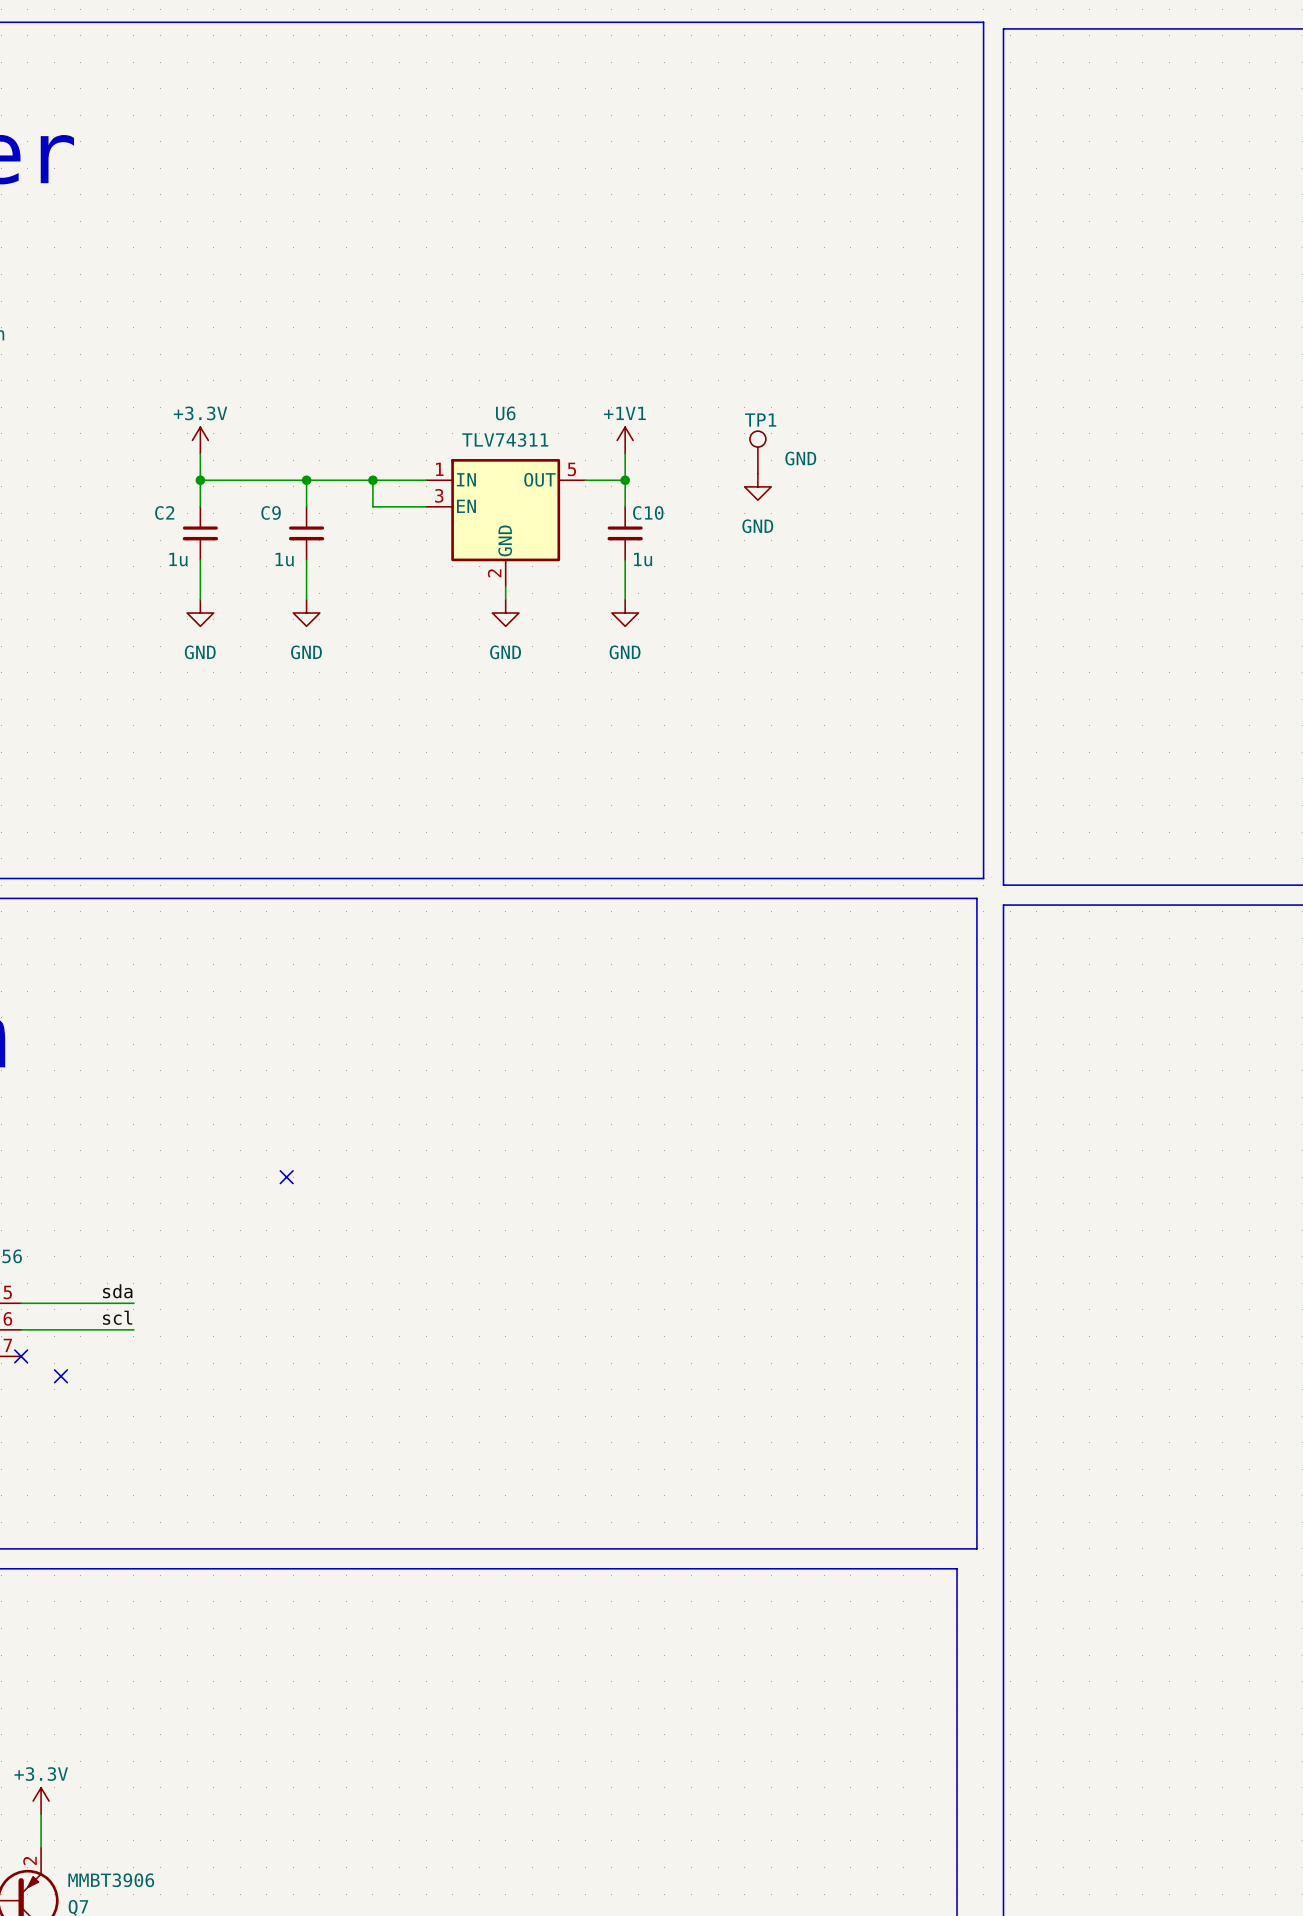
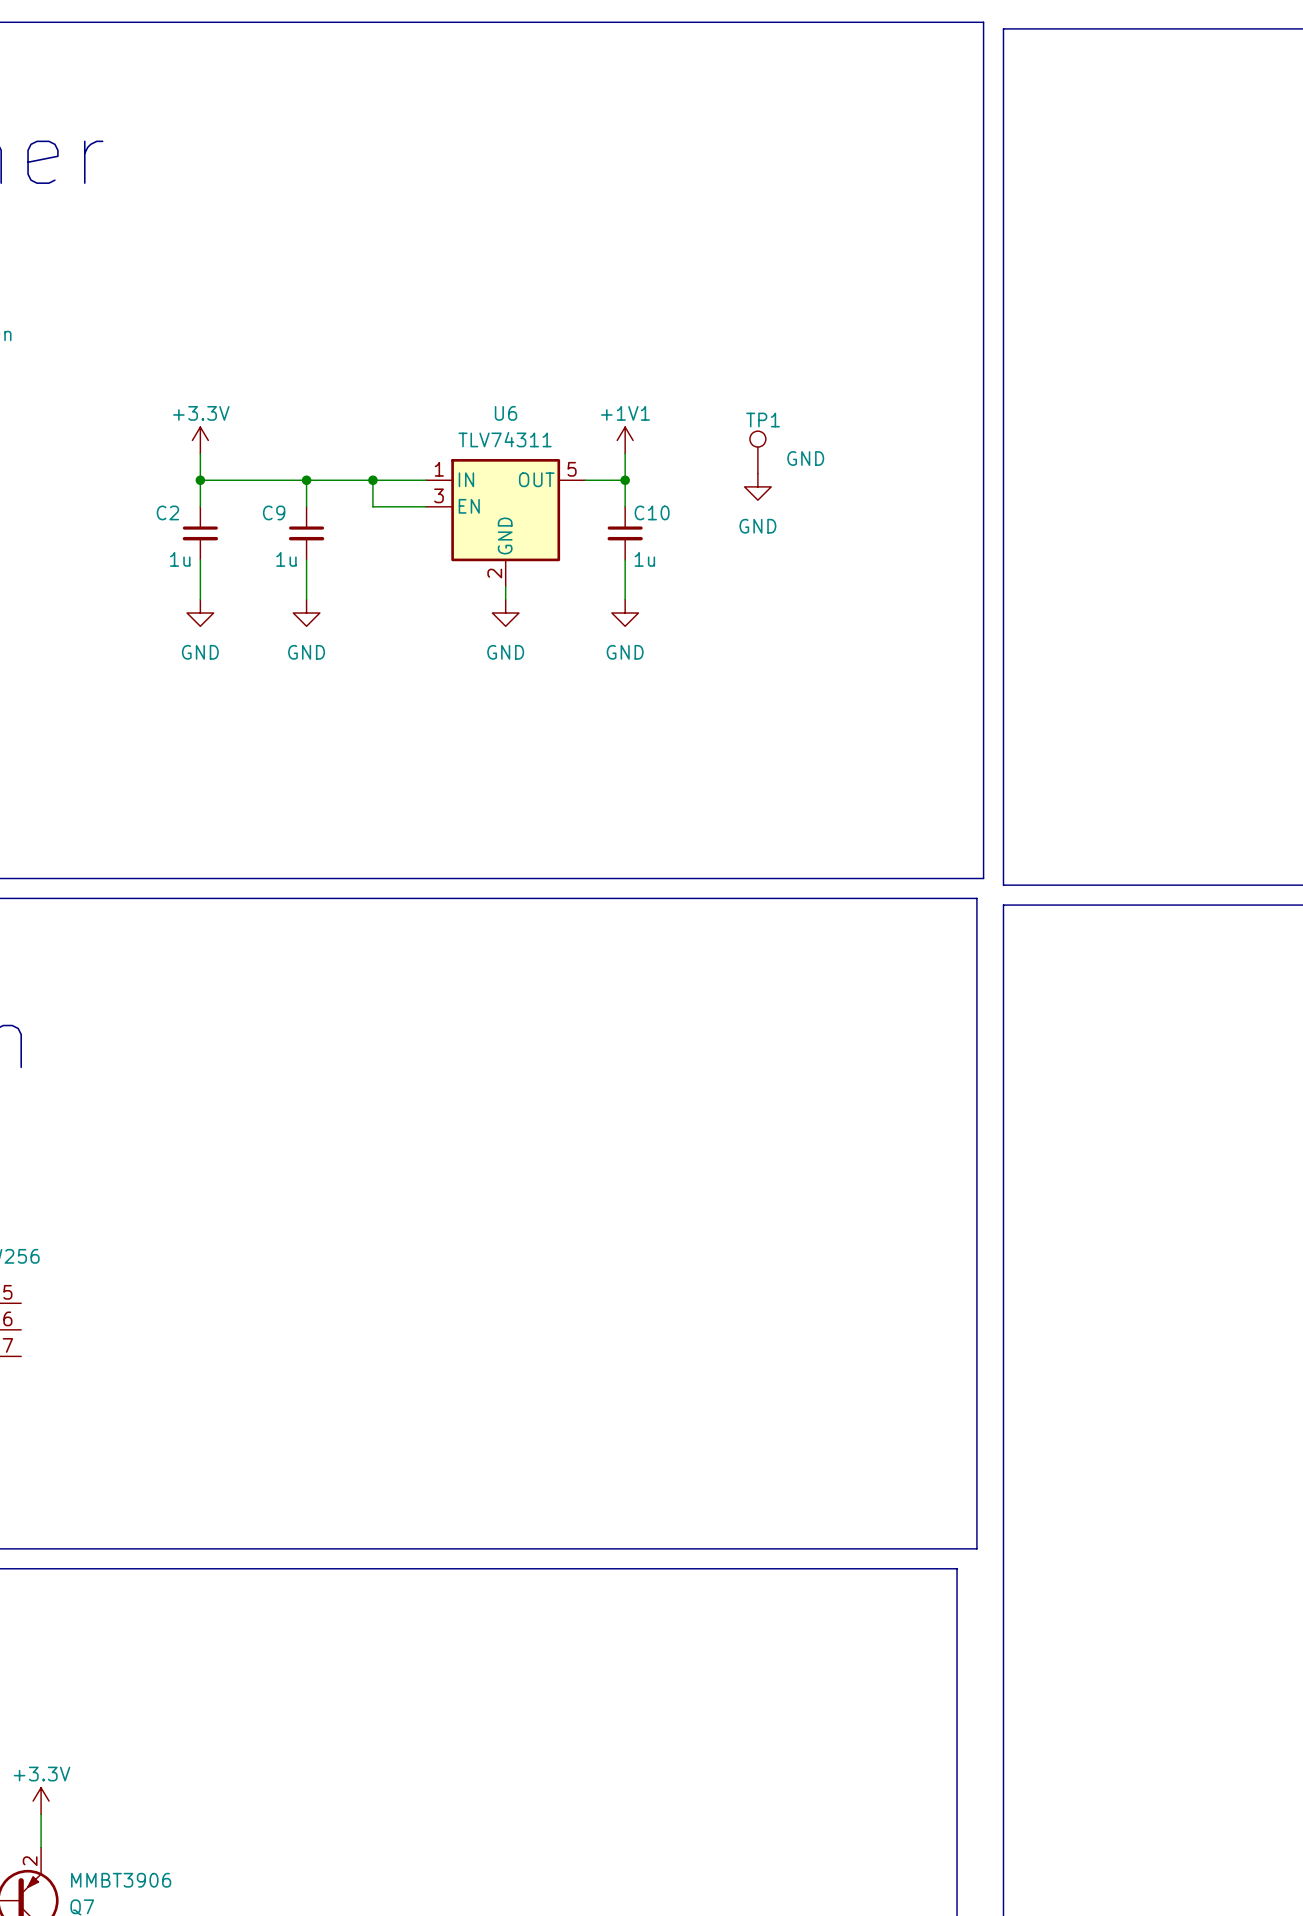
no-connect mark: (286, 1177) -> none
label: sda (117, 1291) -> none
wire: (21, 1303) (133, 1303) -> none
label: scl (117, 1317) -> none
wire: (21, 1329) (133, 1329) -> none
no-connect mark: (21, 1356) -> none
no-connect mark: (60, 1376) -> none

